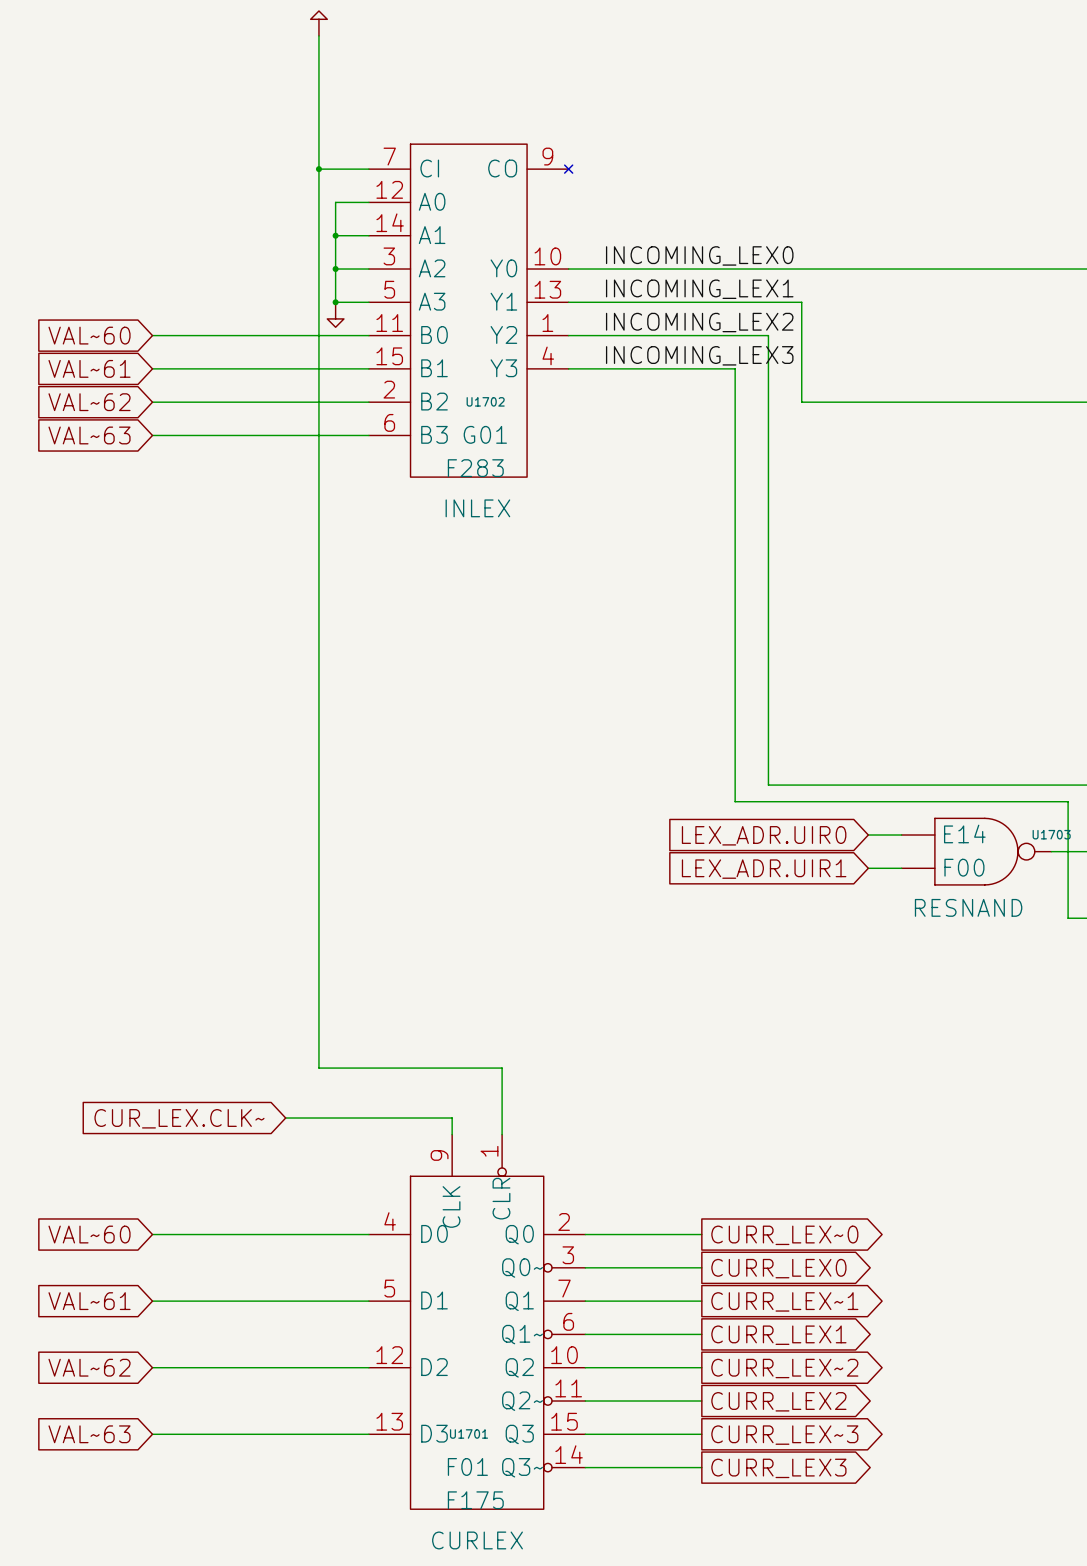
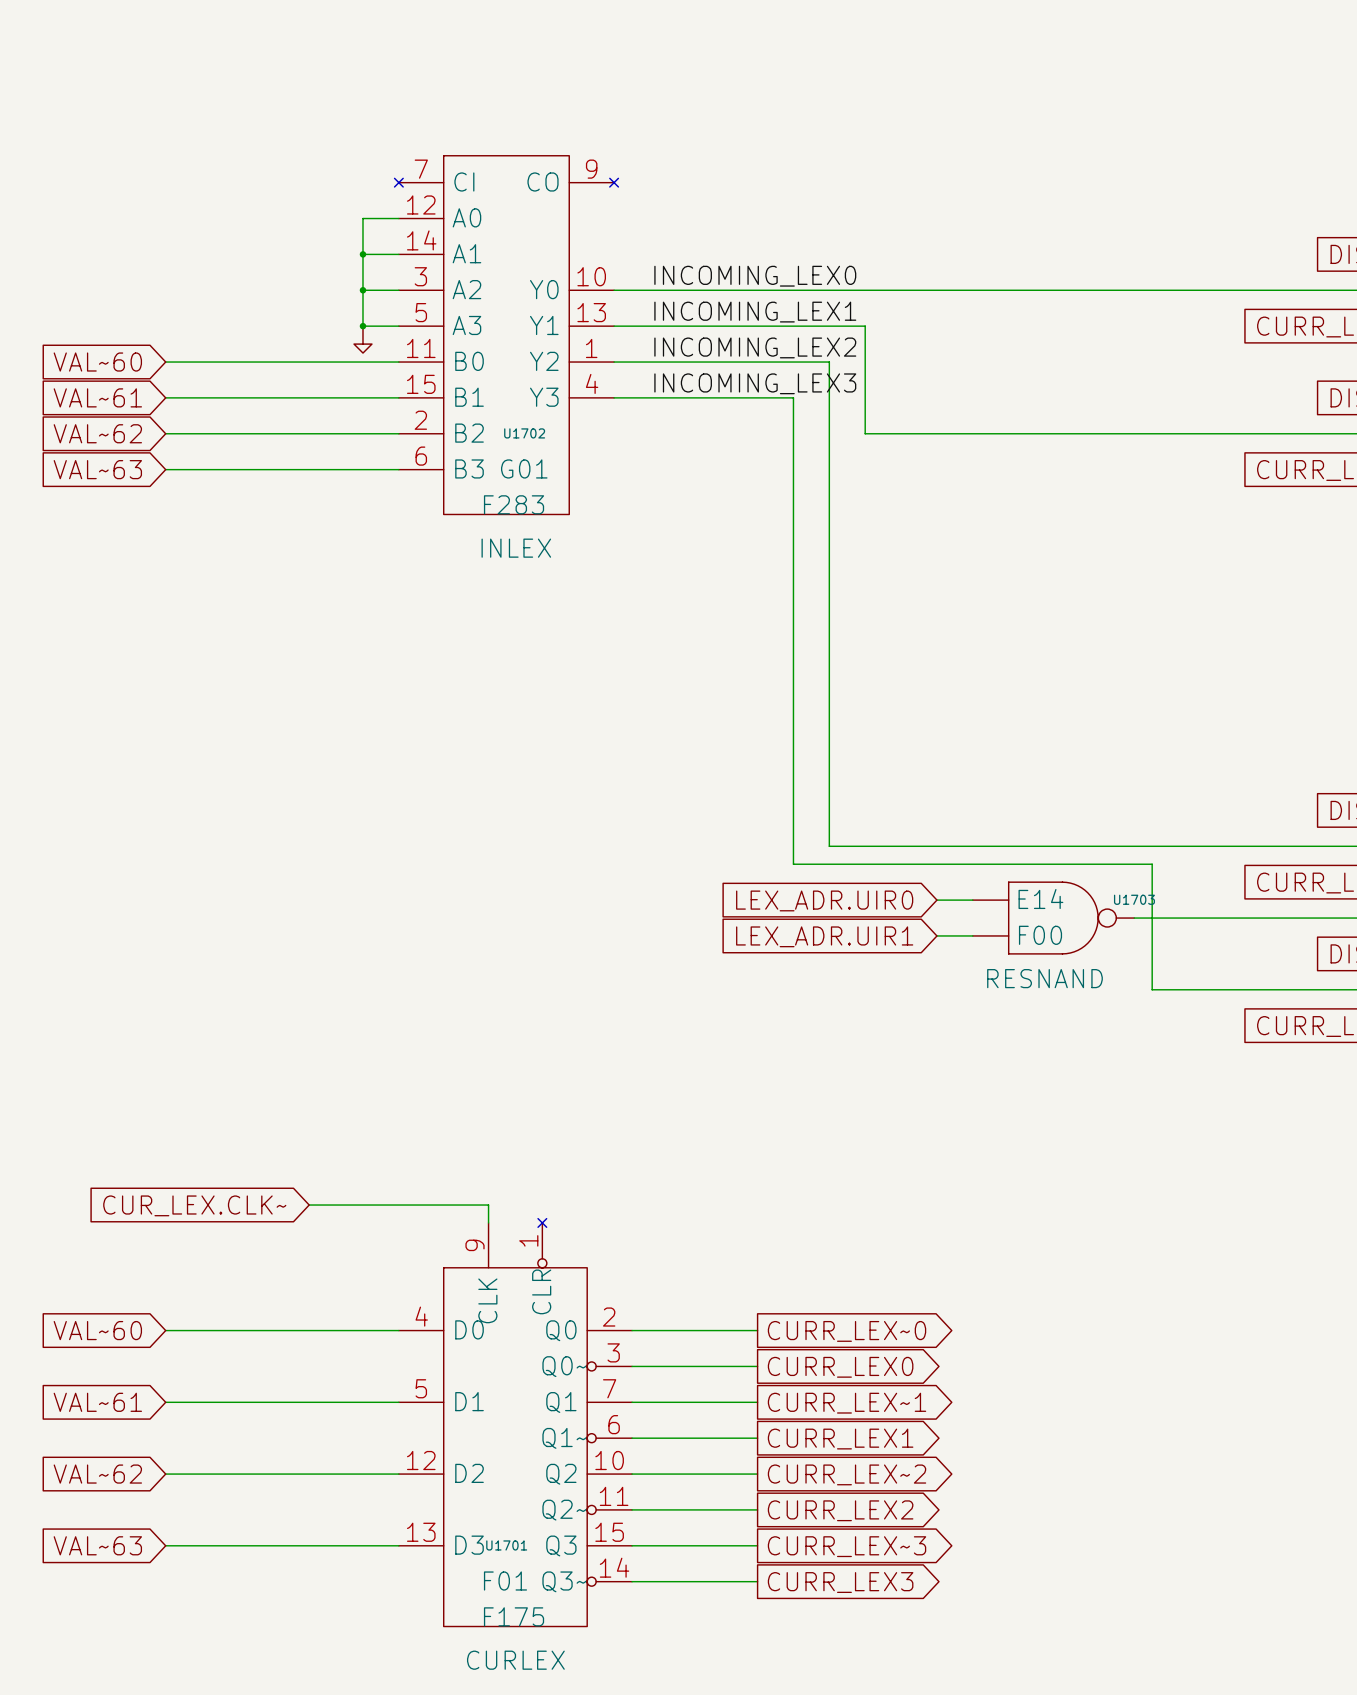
power symbol: (318, 23) -> none
wire: (318, 35) (318, 1068) (502, 1068) (502, 1134) -> none
wire: (318, 169) (368, 169) -> none
junction: (318, 169) -> none
no-connect mark: none -> (398, 182)
no-connect mark: none -> (542, 1222)

